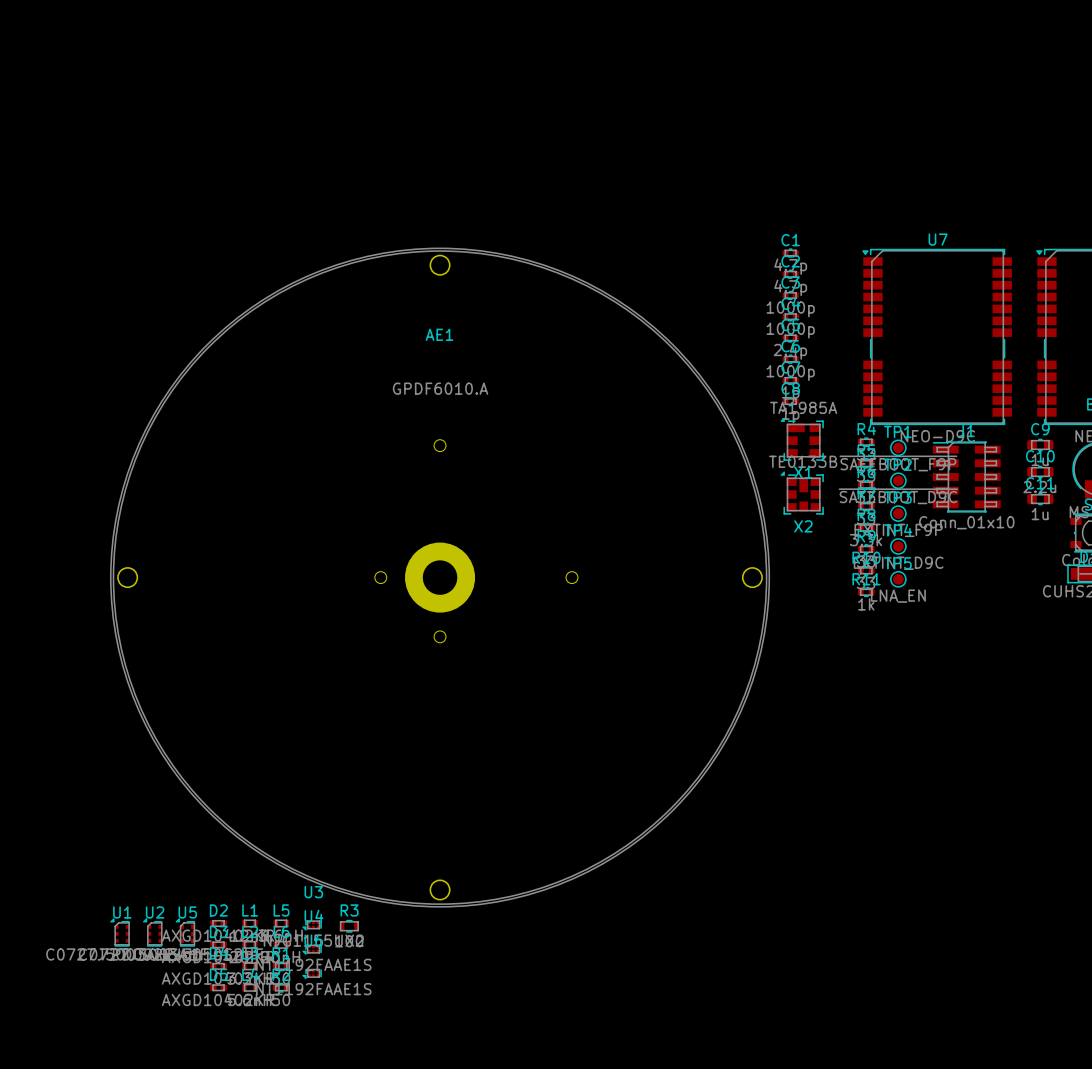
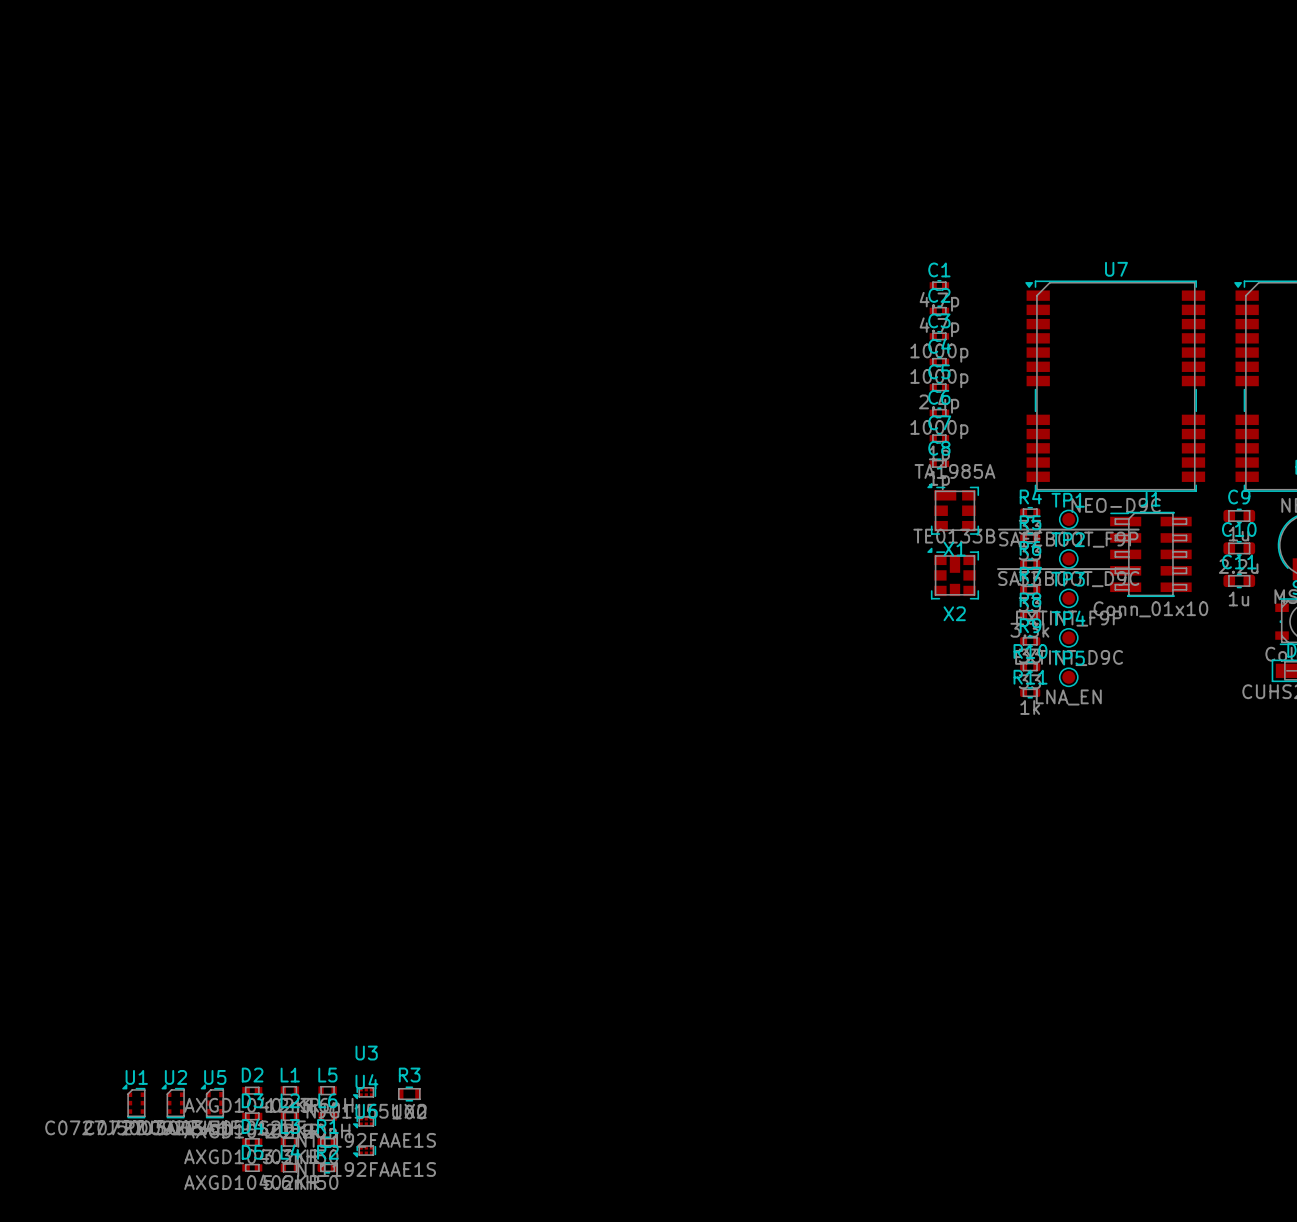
AE1: GPDF6010.A (440, 577) -> none

